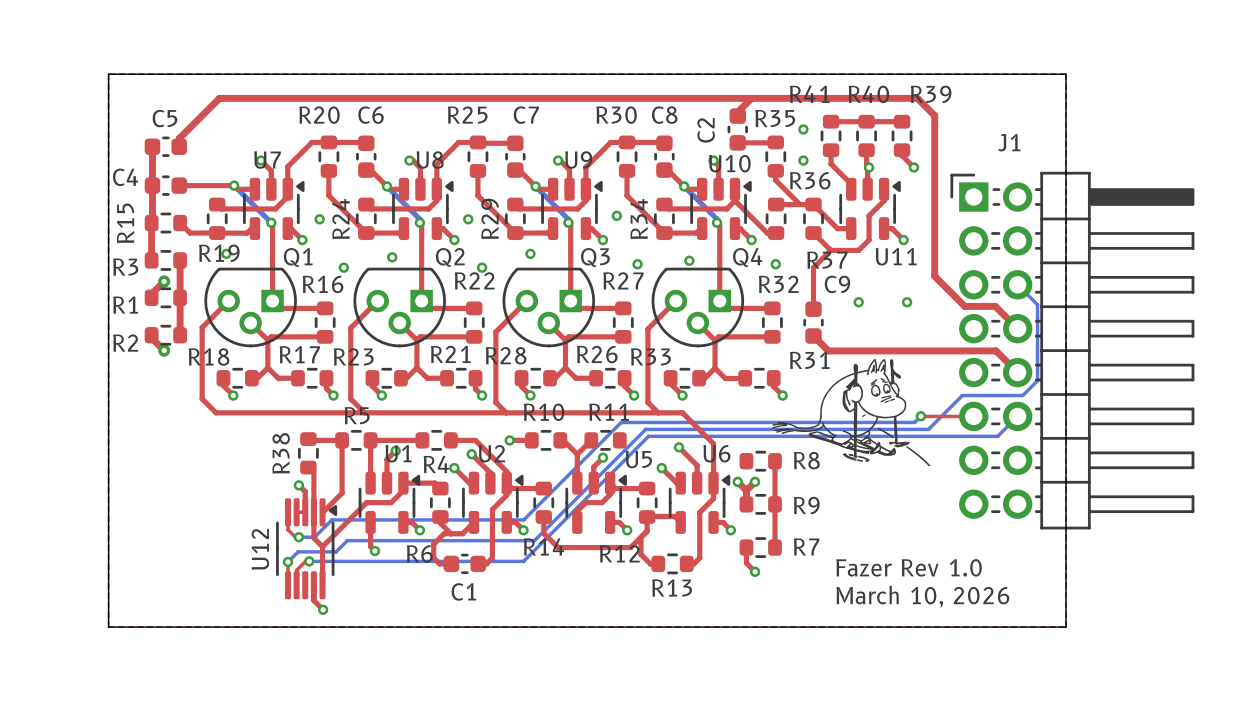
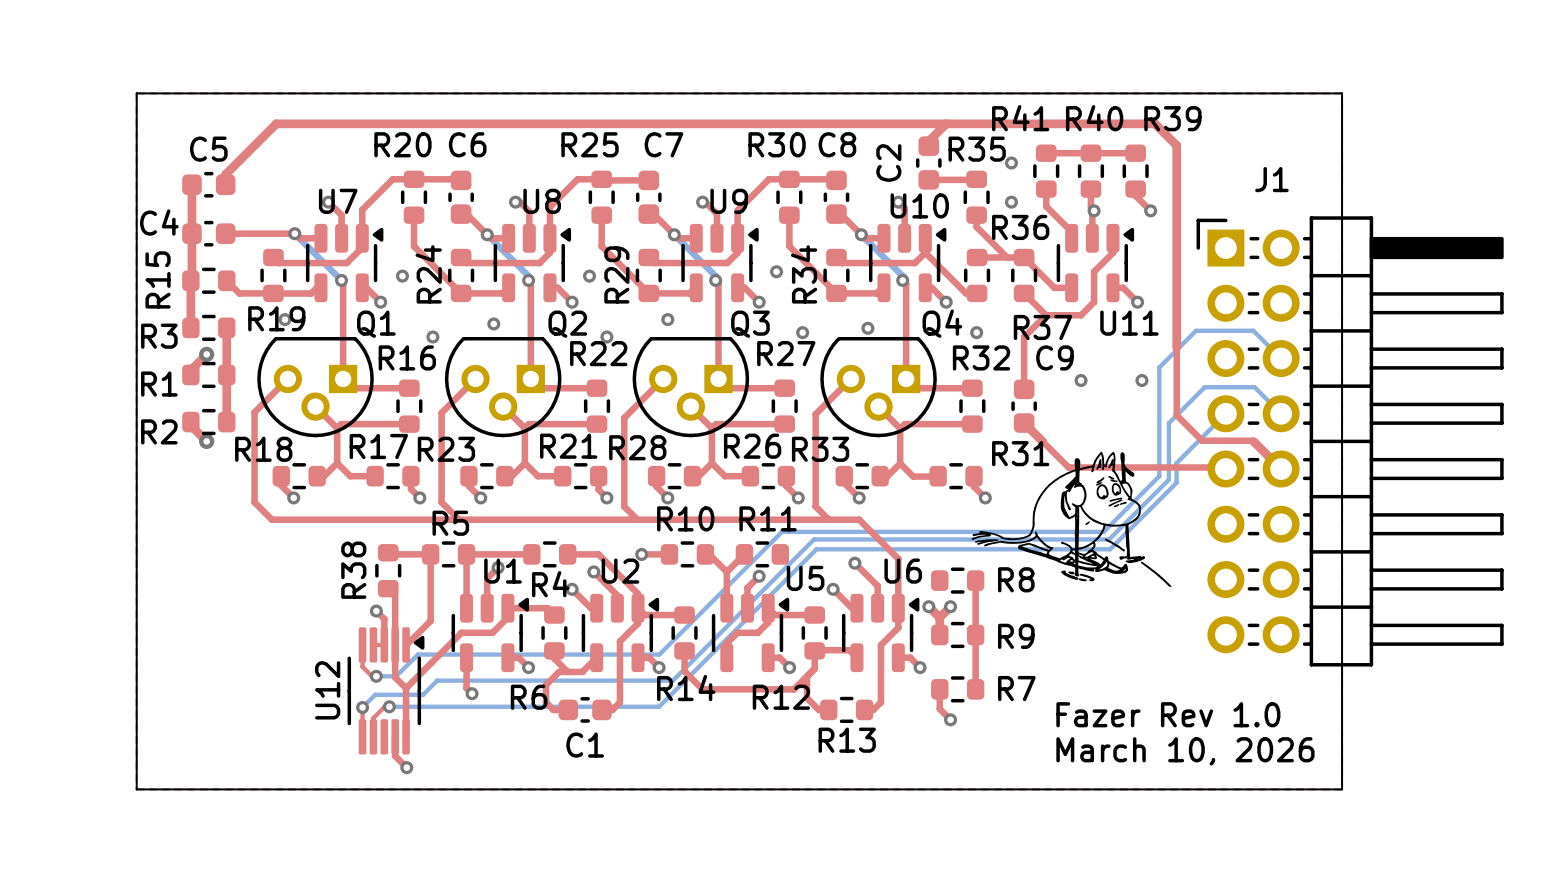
top track: (934, 276) (964, 306) (995, 306) (1017, 328) -> (1176, 347) (1176, 415) (1202, 440) (1253, 441)
bottom track: (1017, 284) (1037, 304) (1037, 380) (1022, 395) (962, 395) (928, 429) (645, 429) -> (1281, 413) (1254, 387) (1204, 387) (1168, 423) (1168, 479) (1109, 539) (812, 540)
top track: (828, 350) (996, 350) -> (1042, 441) (1068, 467) (1224, 467) (1225, 469)
bottom track: (920, 416) (914, 422) (876, 422) -> (1281, 358) (1253, 330) (1196, 330) (1159, 367) (1159, 476) (1103, 531)
via: (920, 416) -> none
top track: (921, 416) (973, 416) -> none
bottom track: (1017, 416) (997, 436) (881, 436) -> (1225, 413) (1176, 463) (1176, 482) (1110, 549)

